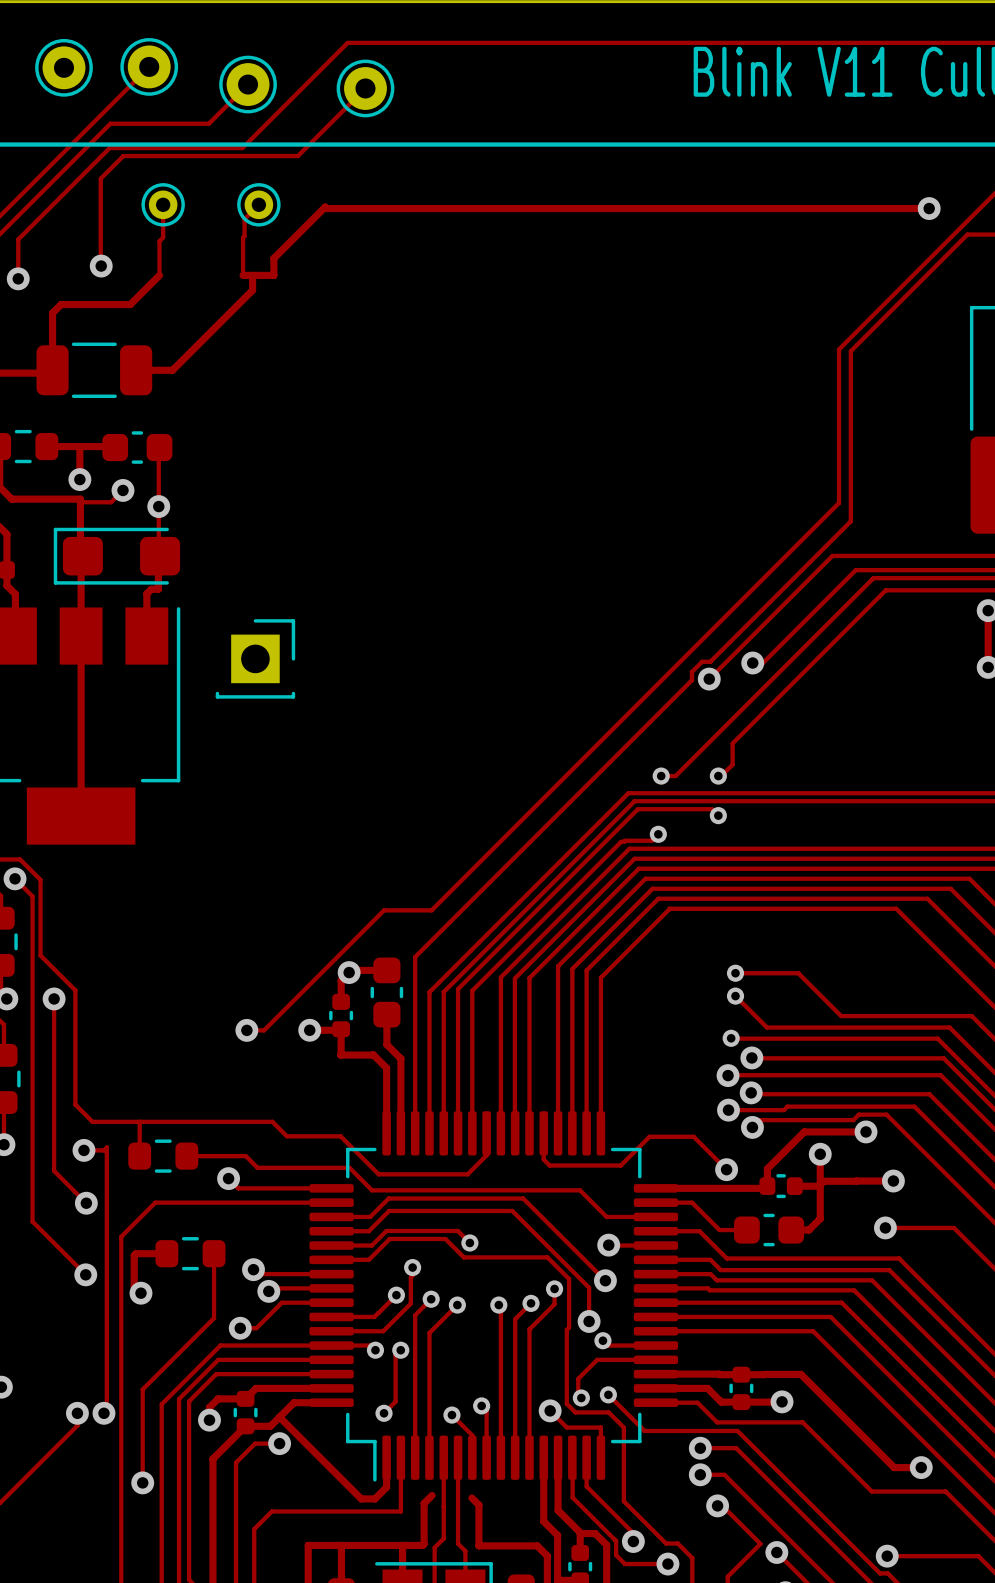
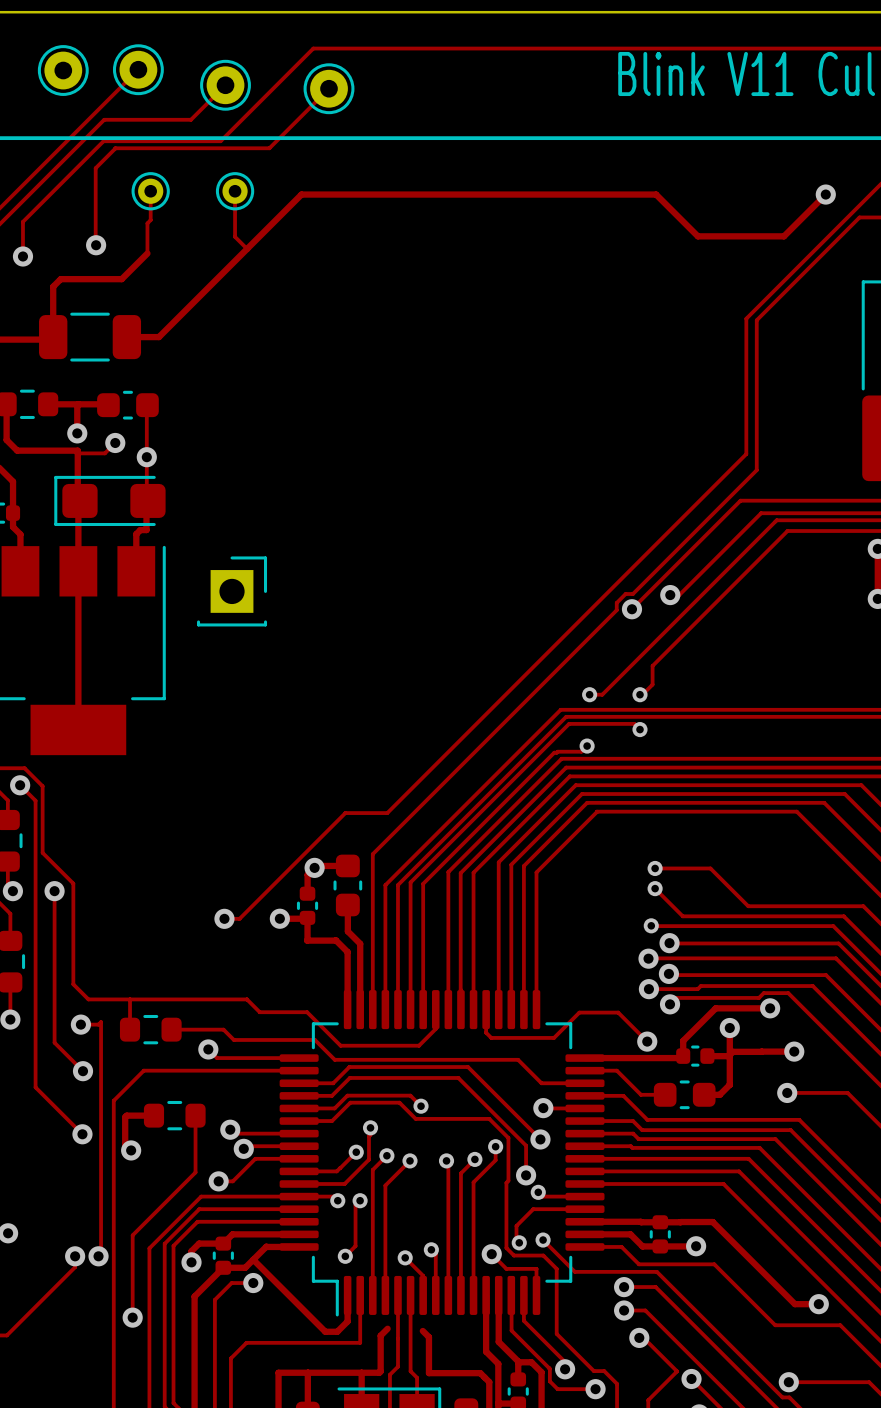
track: (258, 204) (244, 219) (243, 275) (273, 275) (273, 258) (325, 207) (334, 208) -> (229, 266) (301, 194)
track: none -> (235, 191) (235, 236) (247, 248)
track: (736, 208) (929, 208) -> (656, 194) (697, 236) (784, 236) (825, 194)
track: (252, 275) (252, 290) -> none

